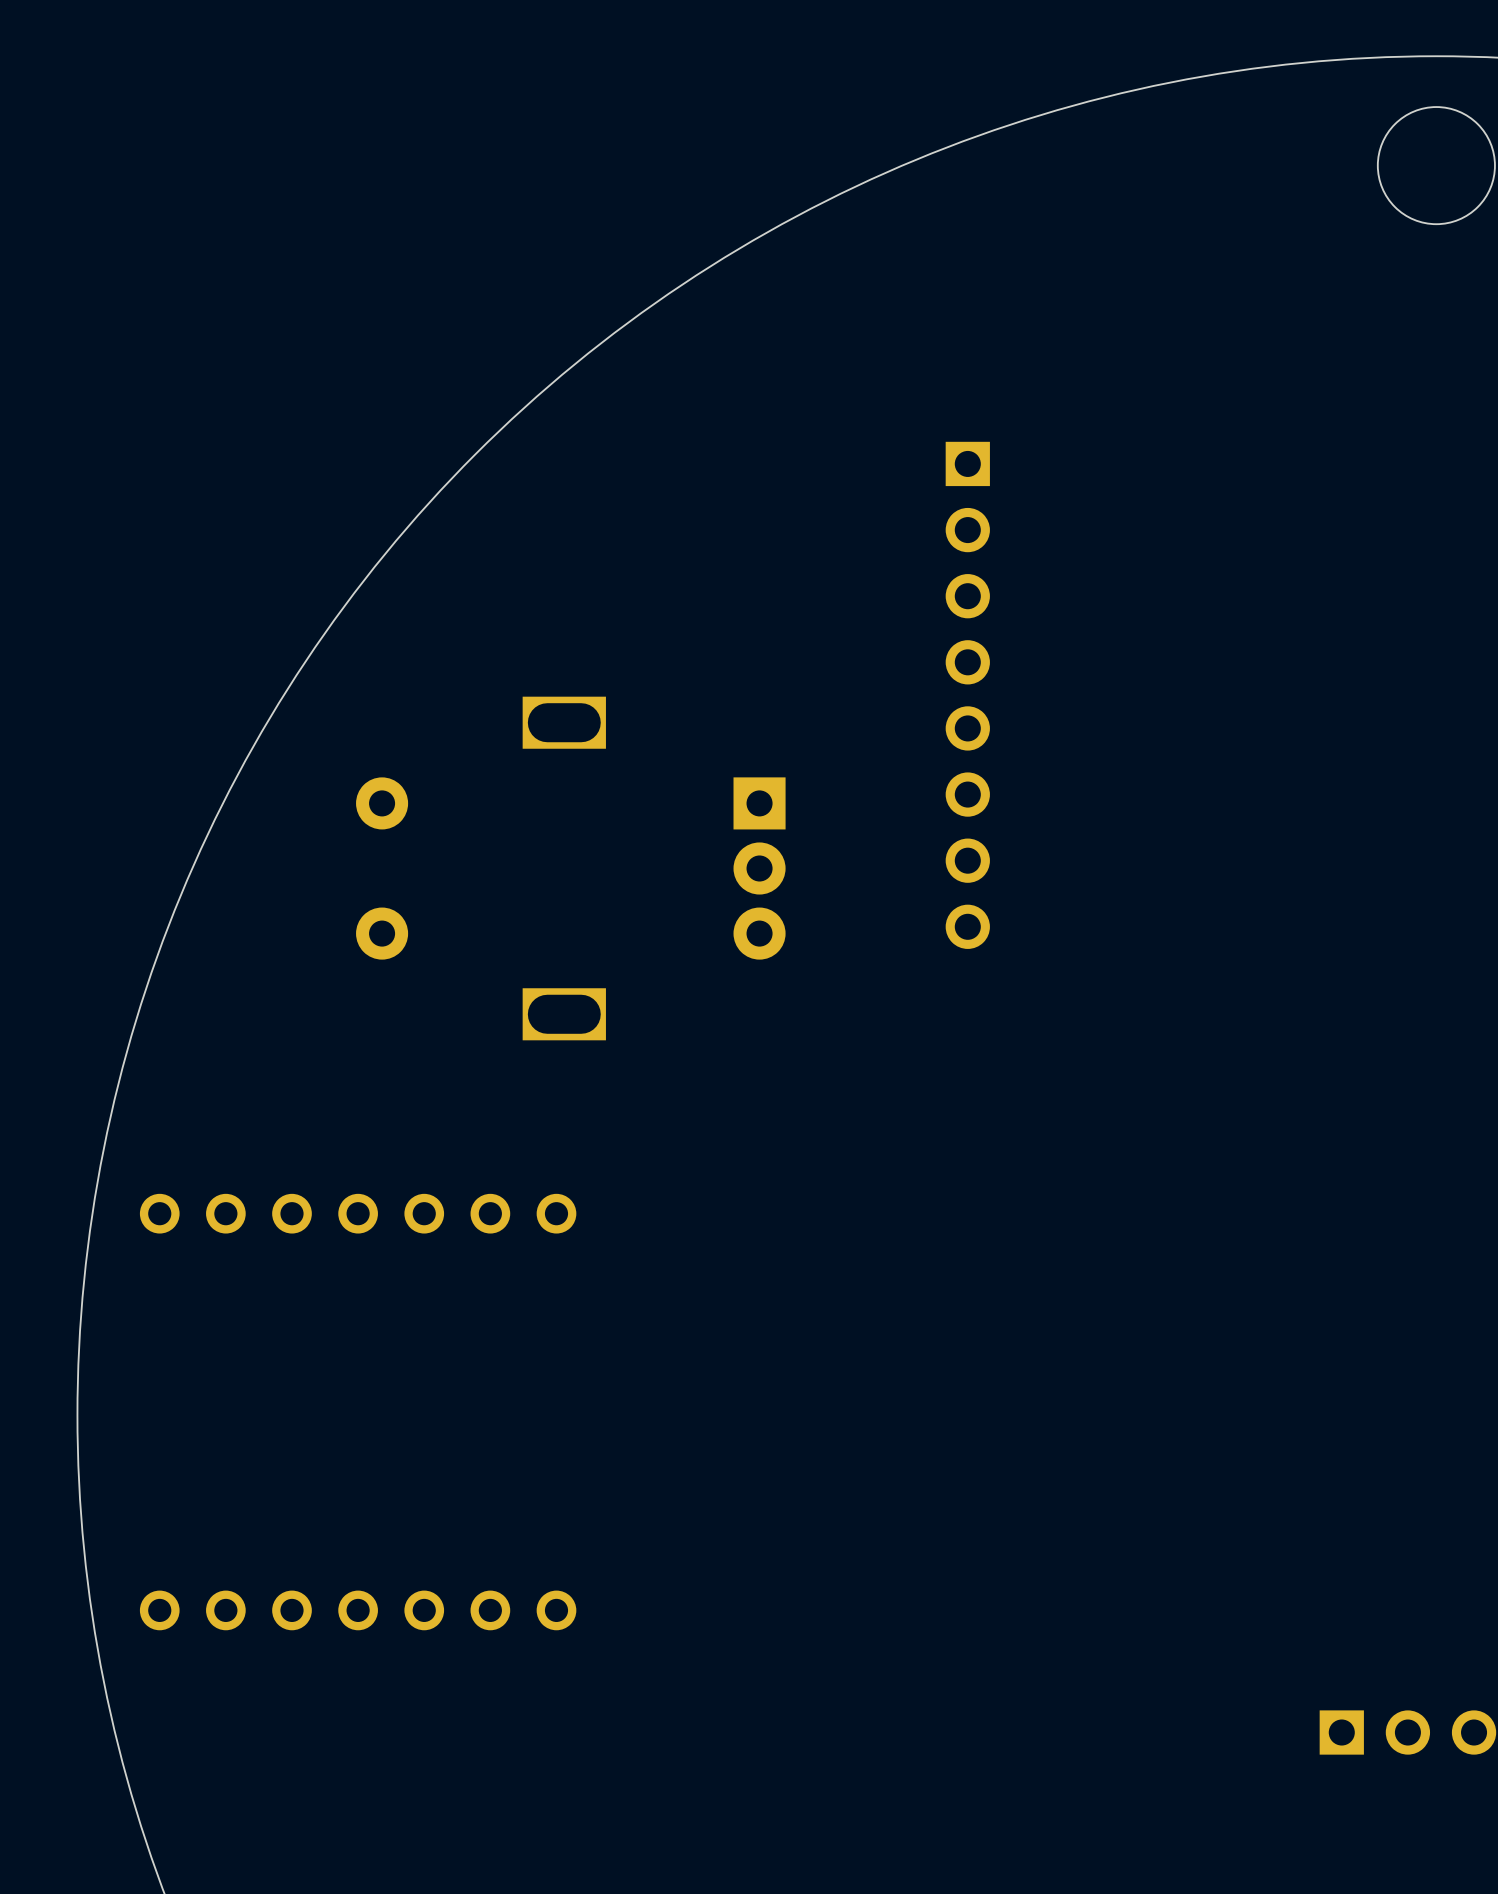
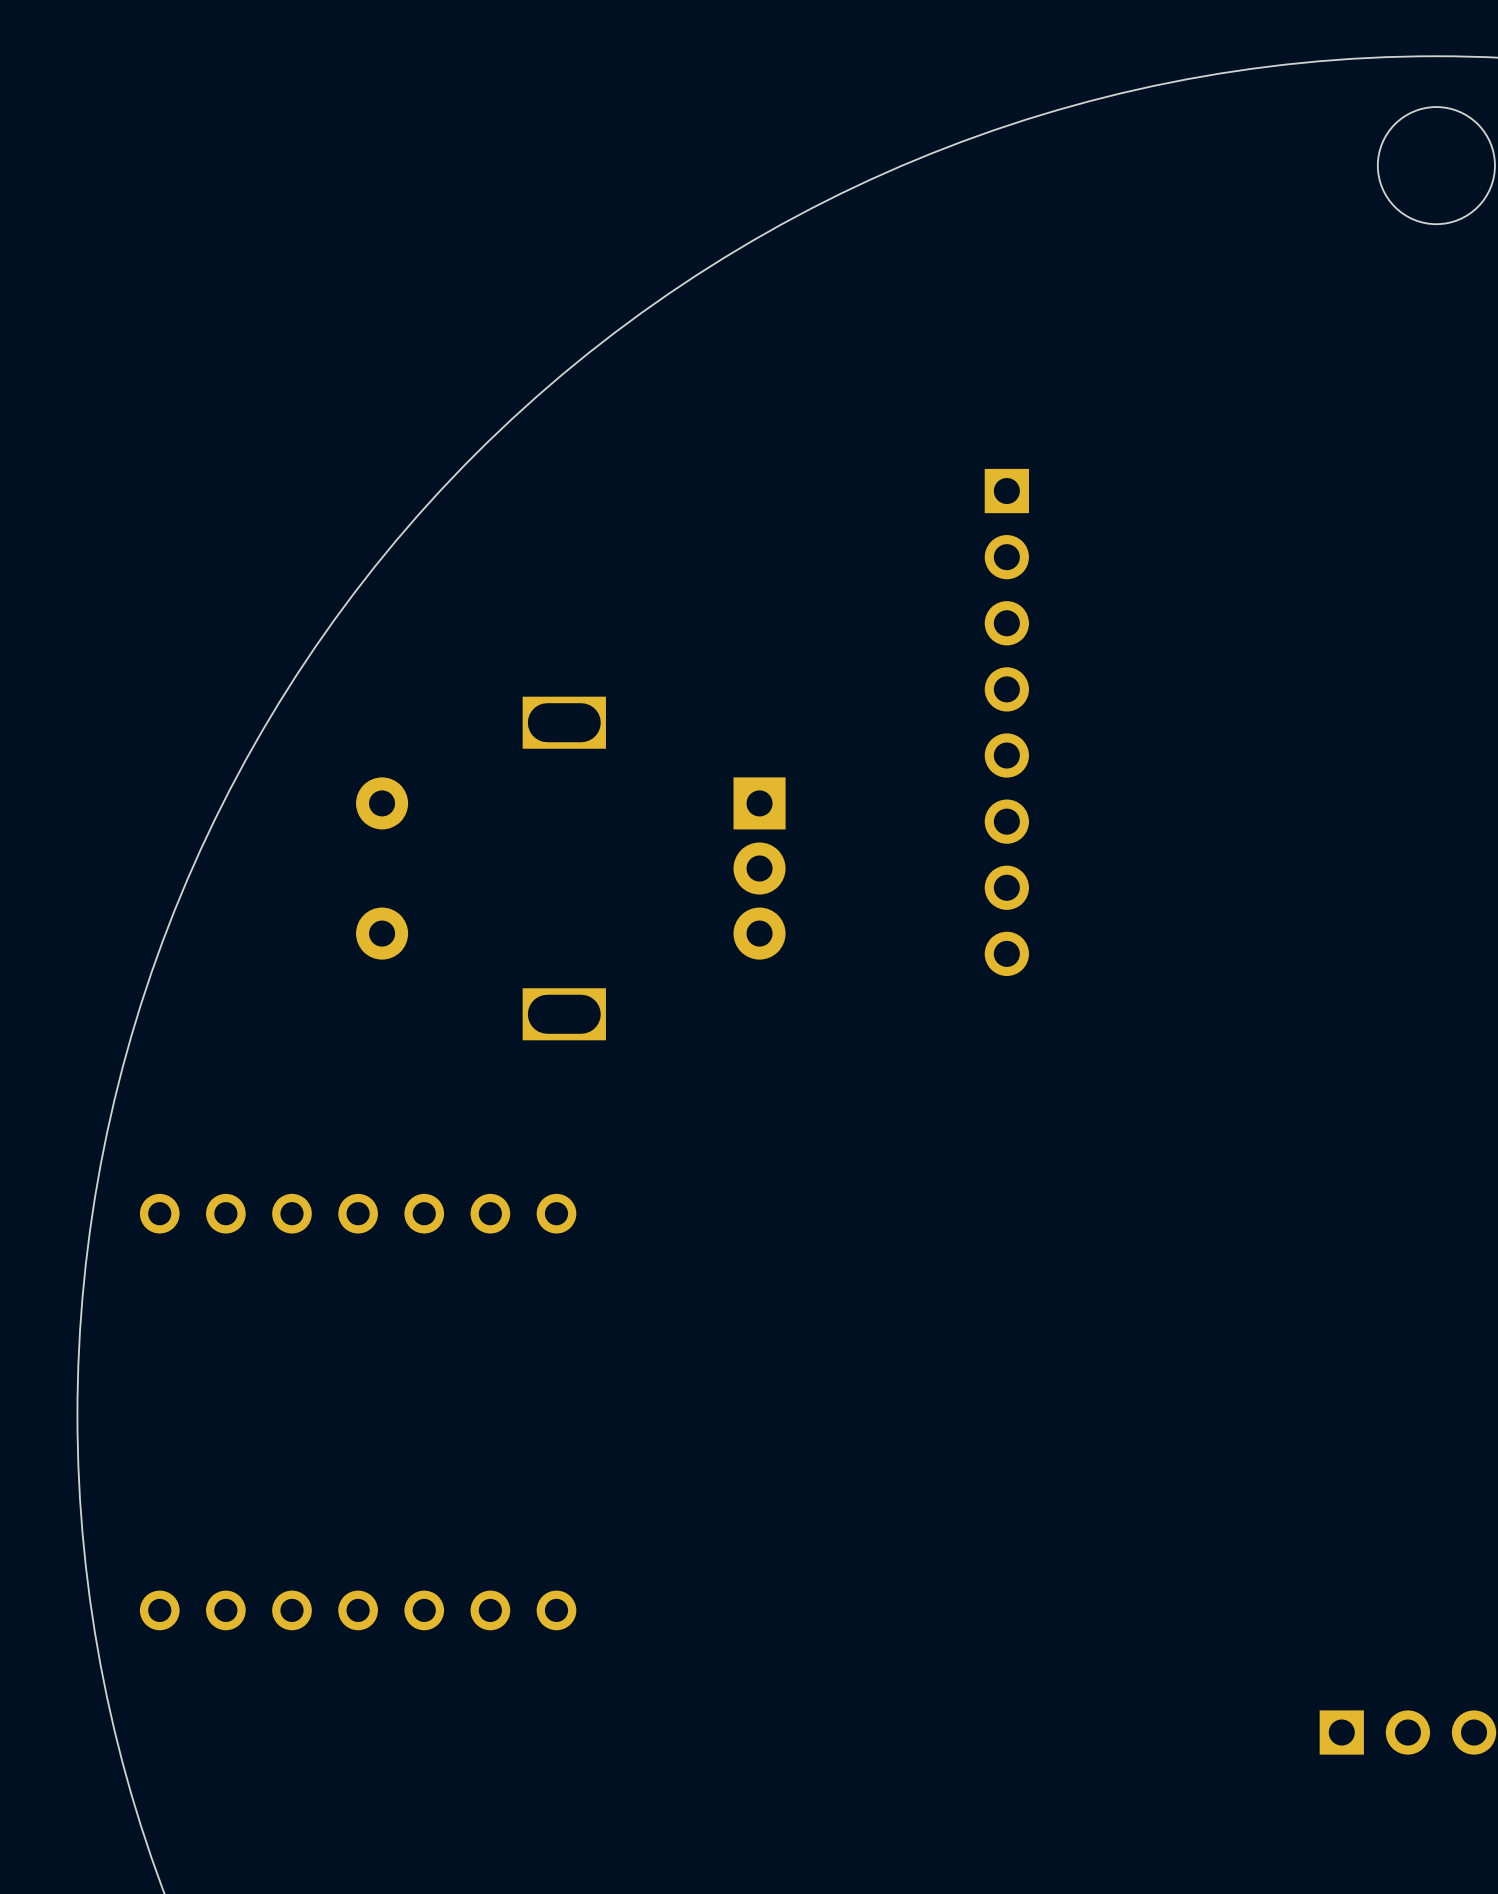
part position: (967, 695) -> (1006, 722)

